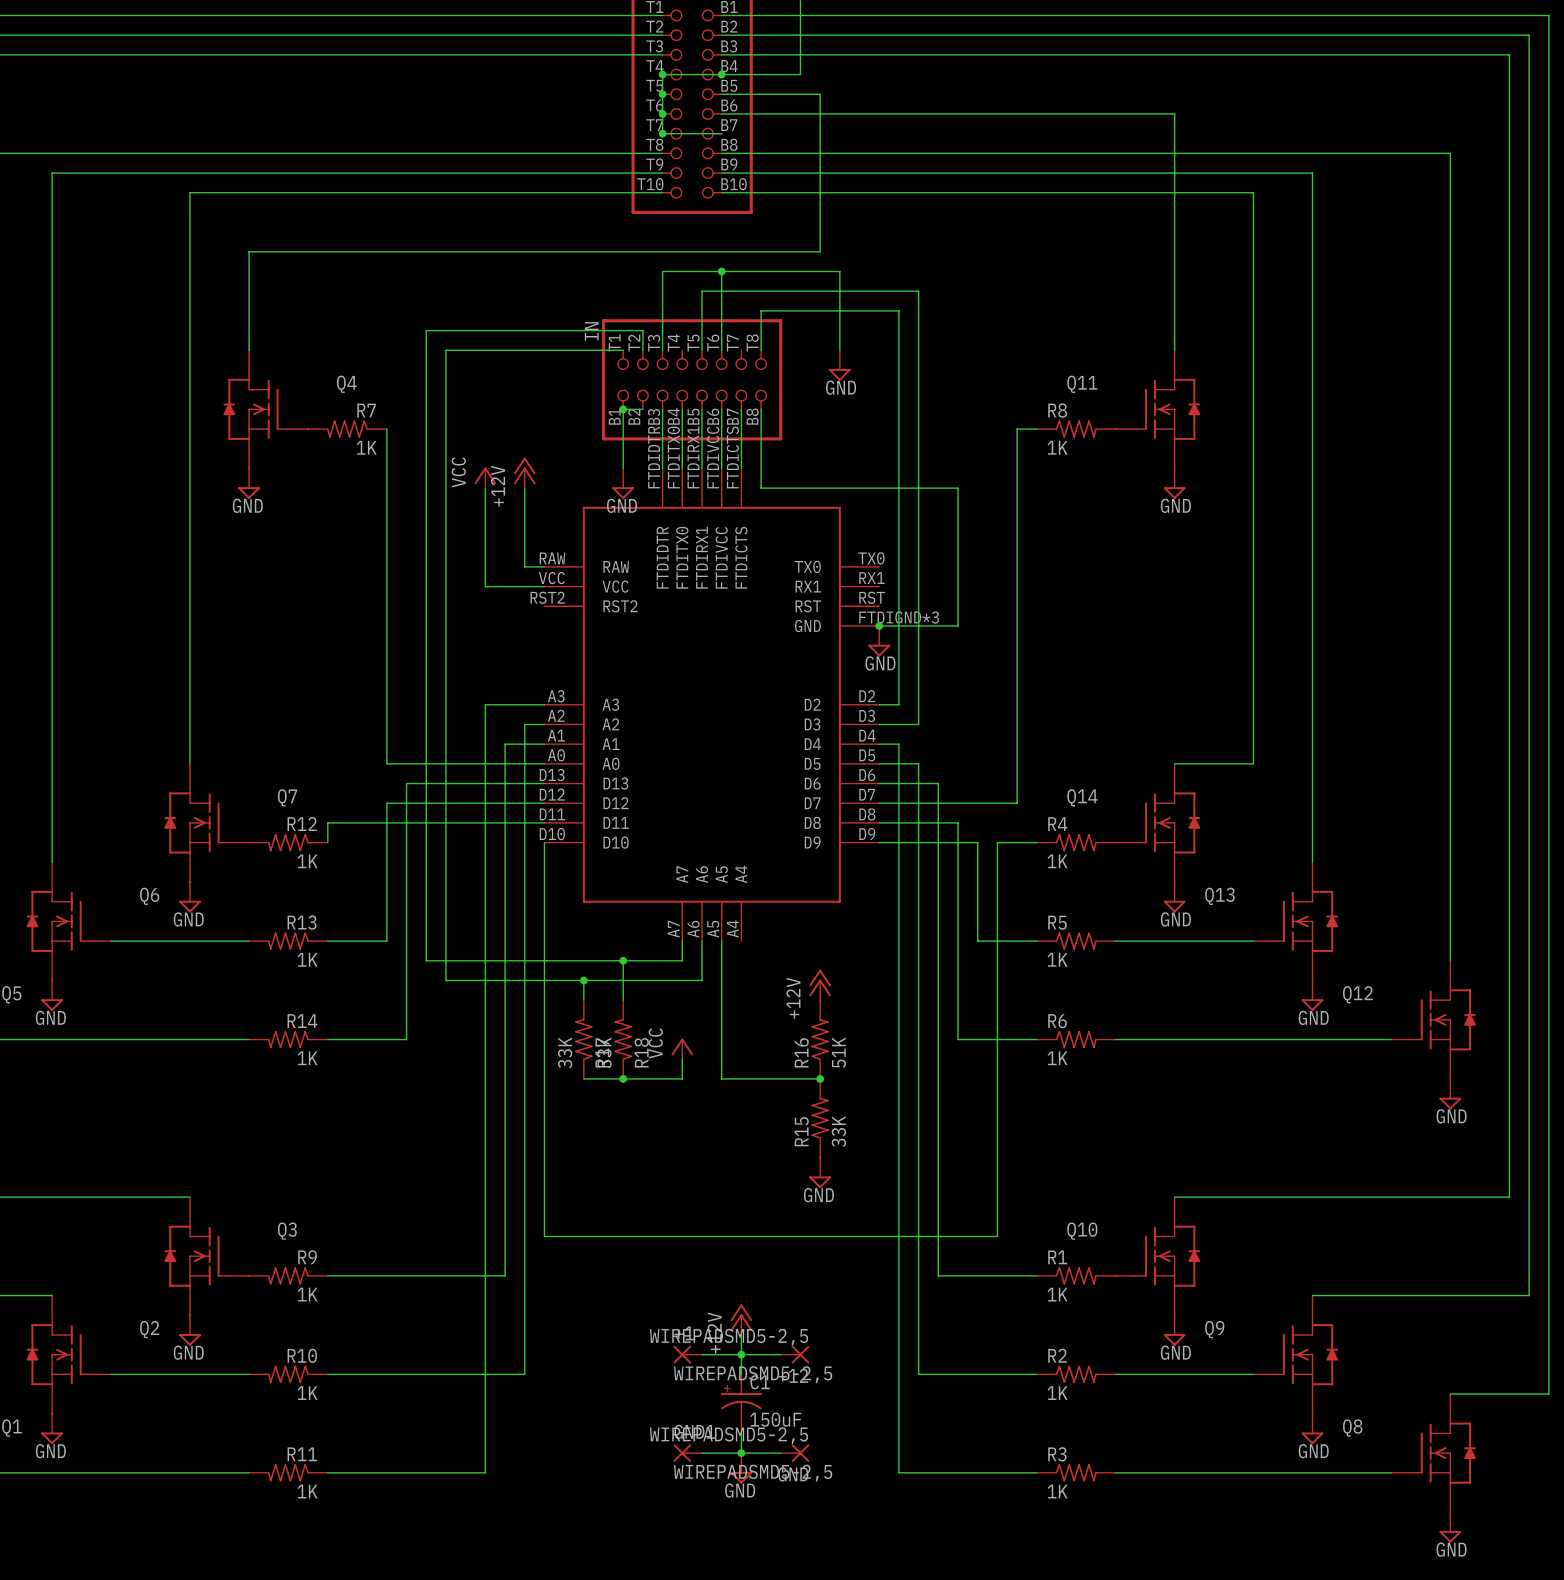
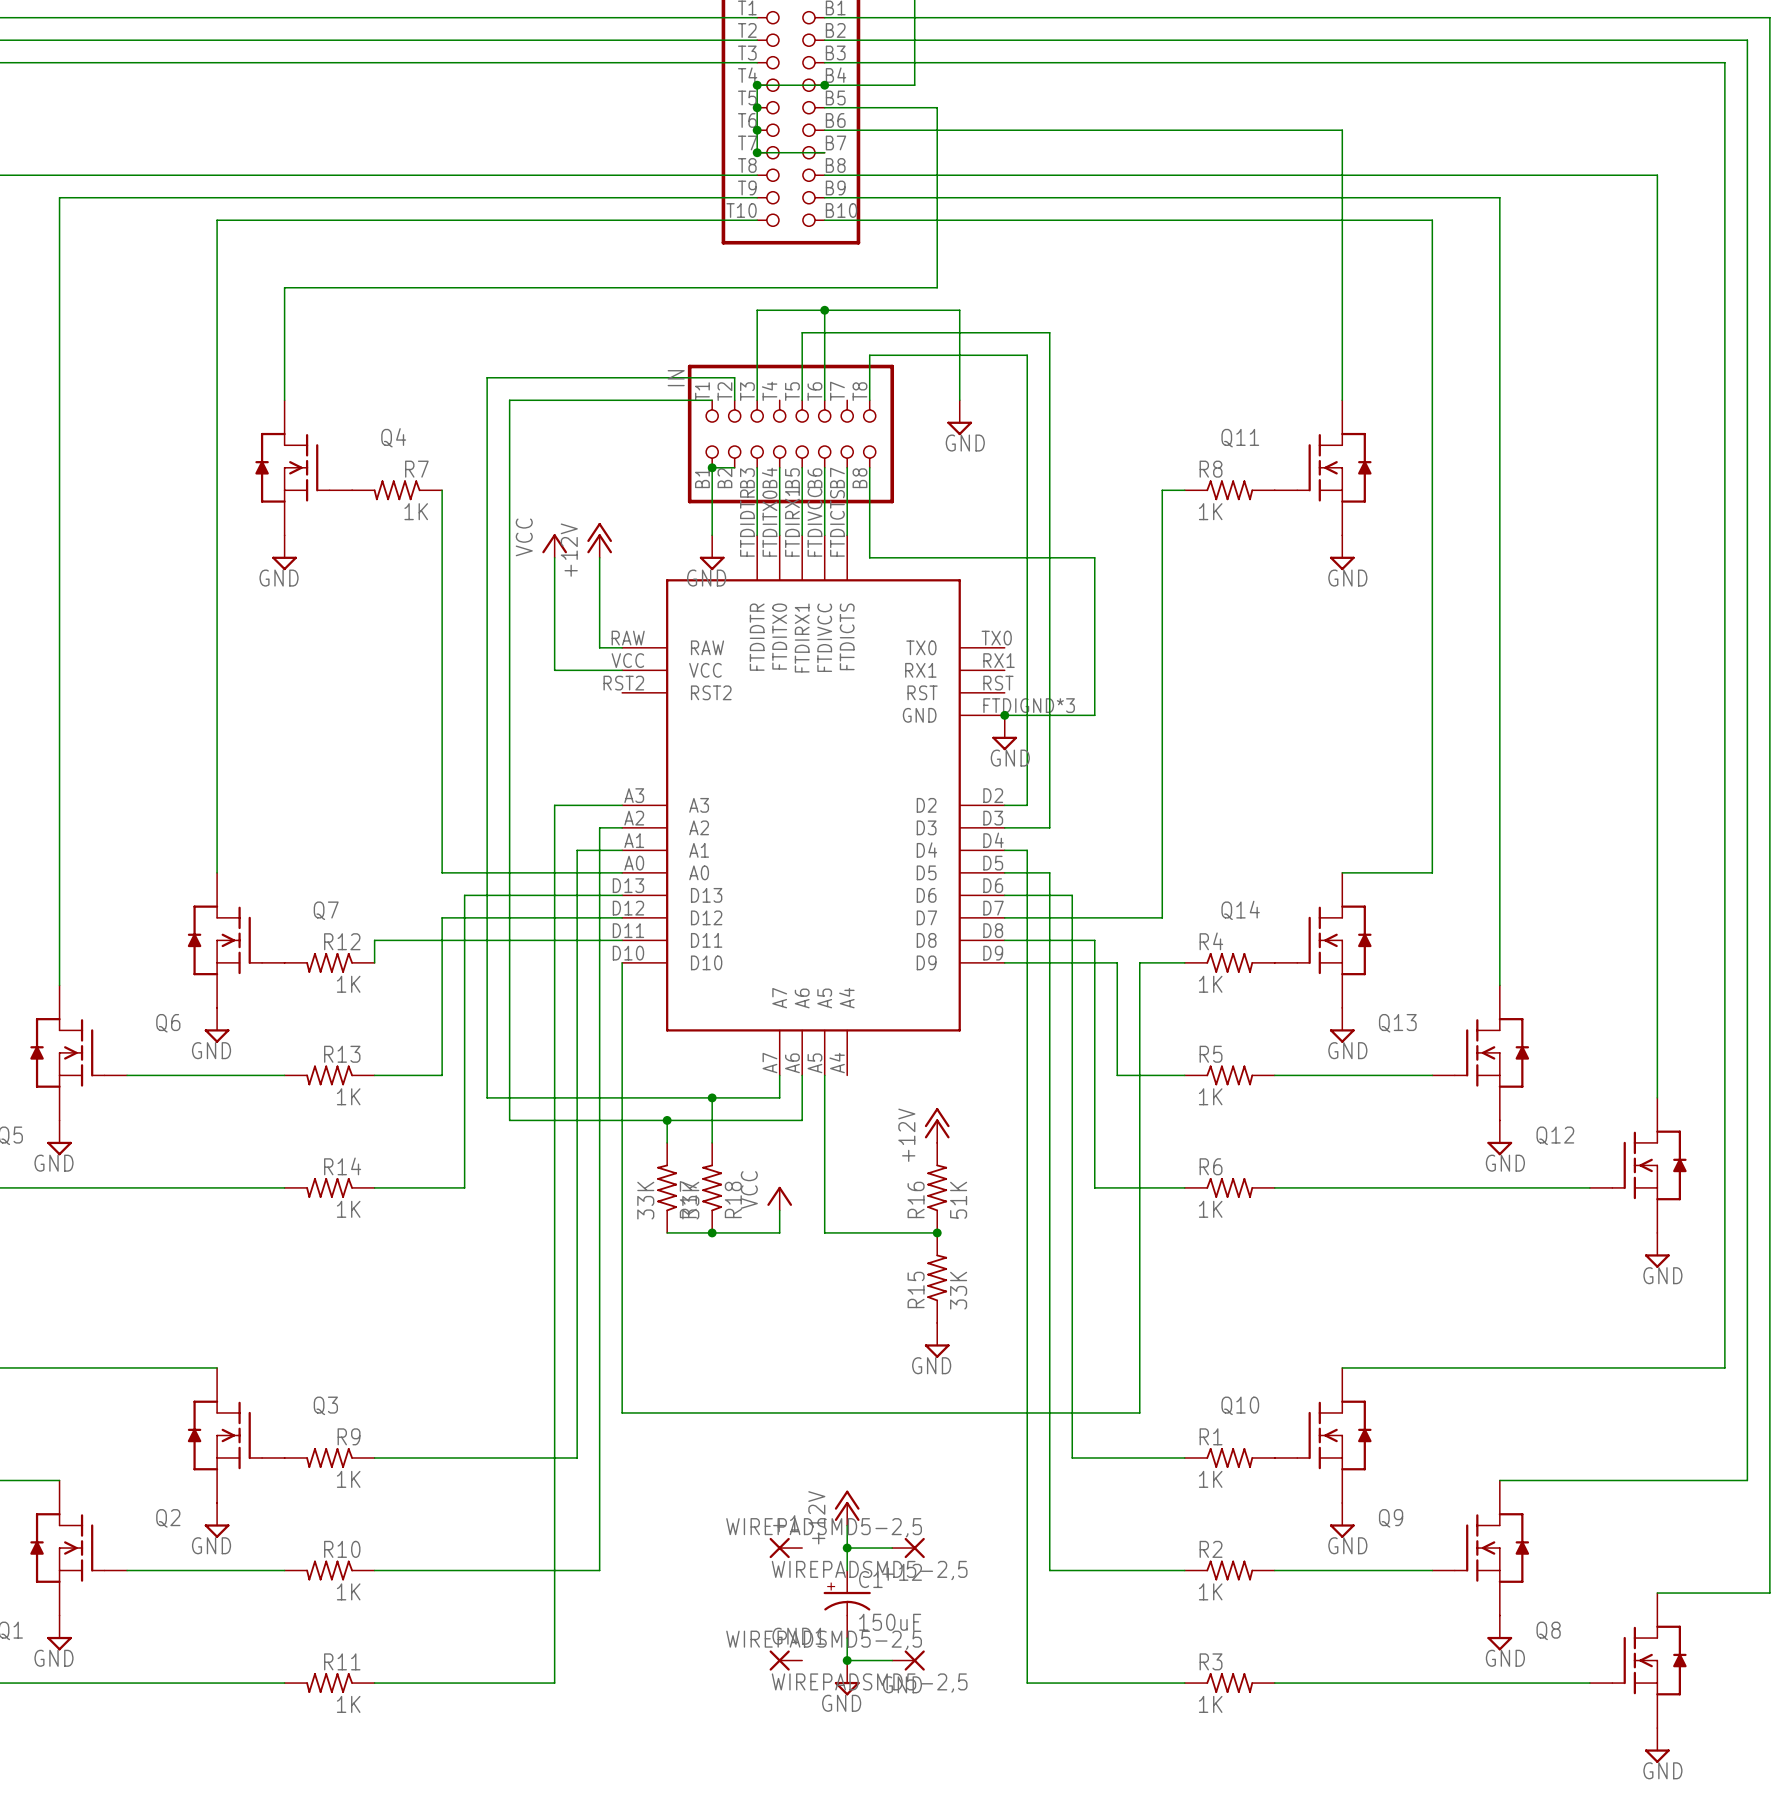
wire: (702, 1354) (741, 1354) -> none
wire: (702, 1453) (741, 1453) -> none

